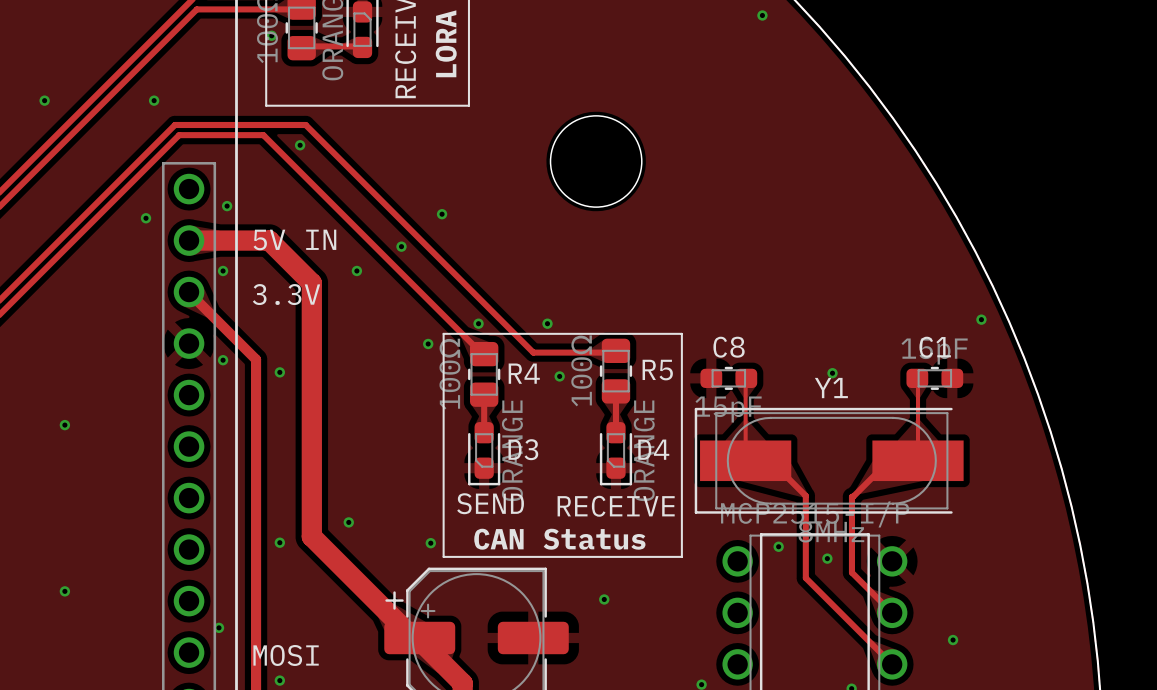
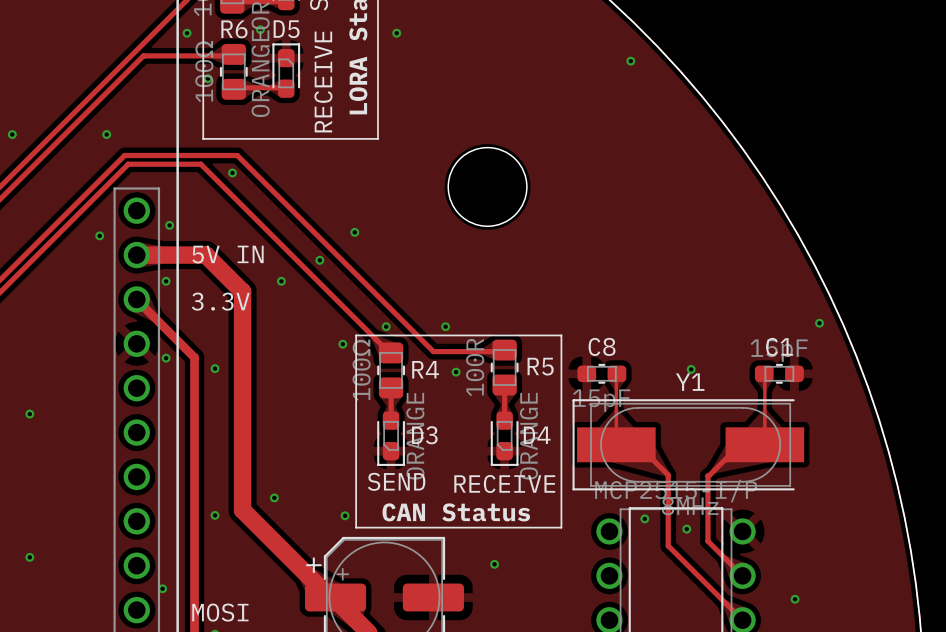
R5 value: 100Ω (581, 370) -> 100R (475, 367)

